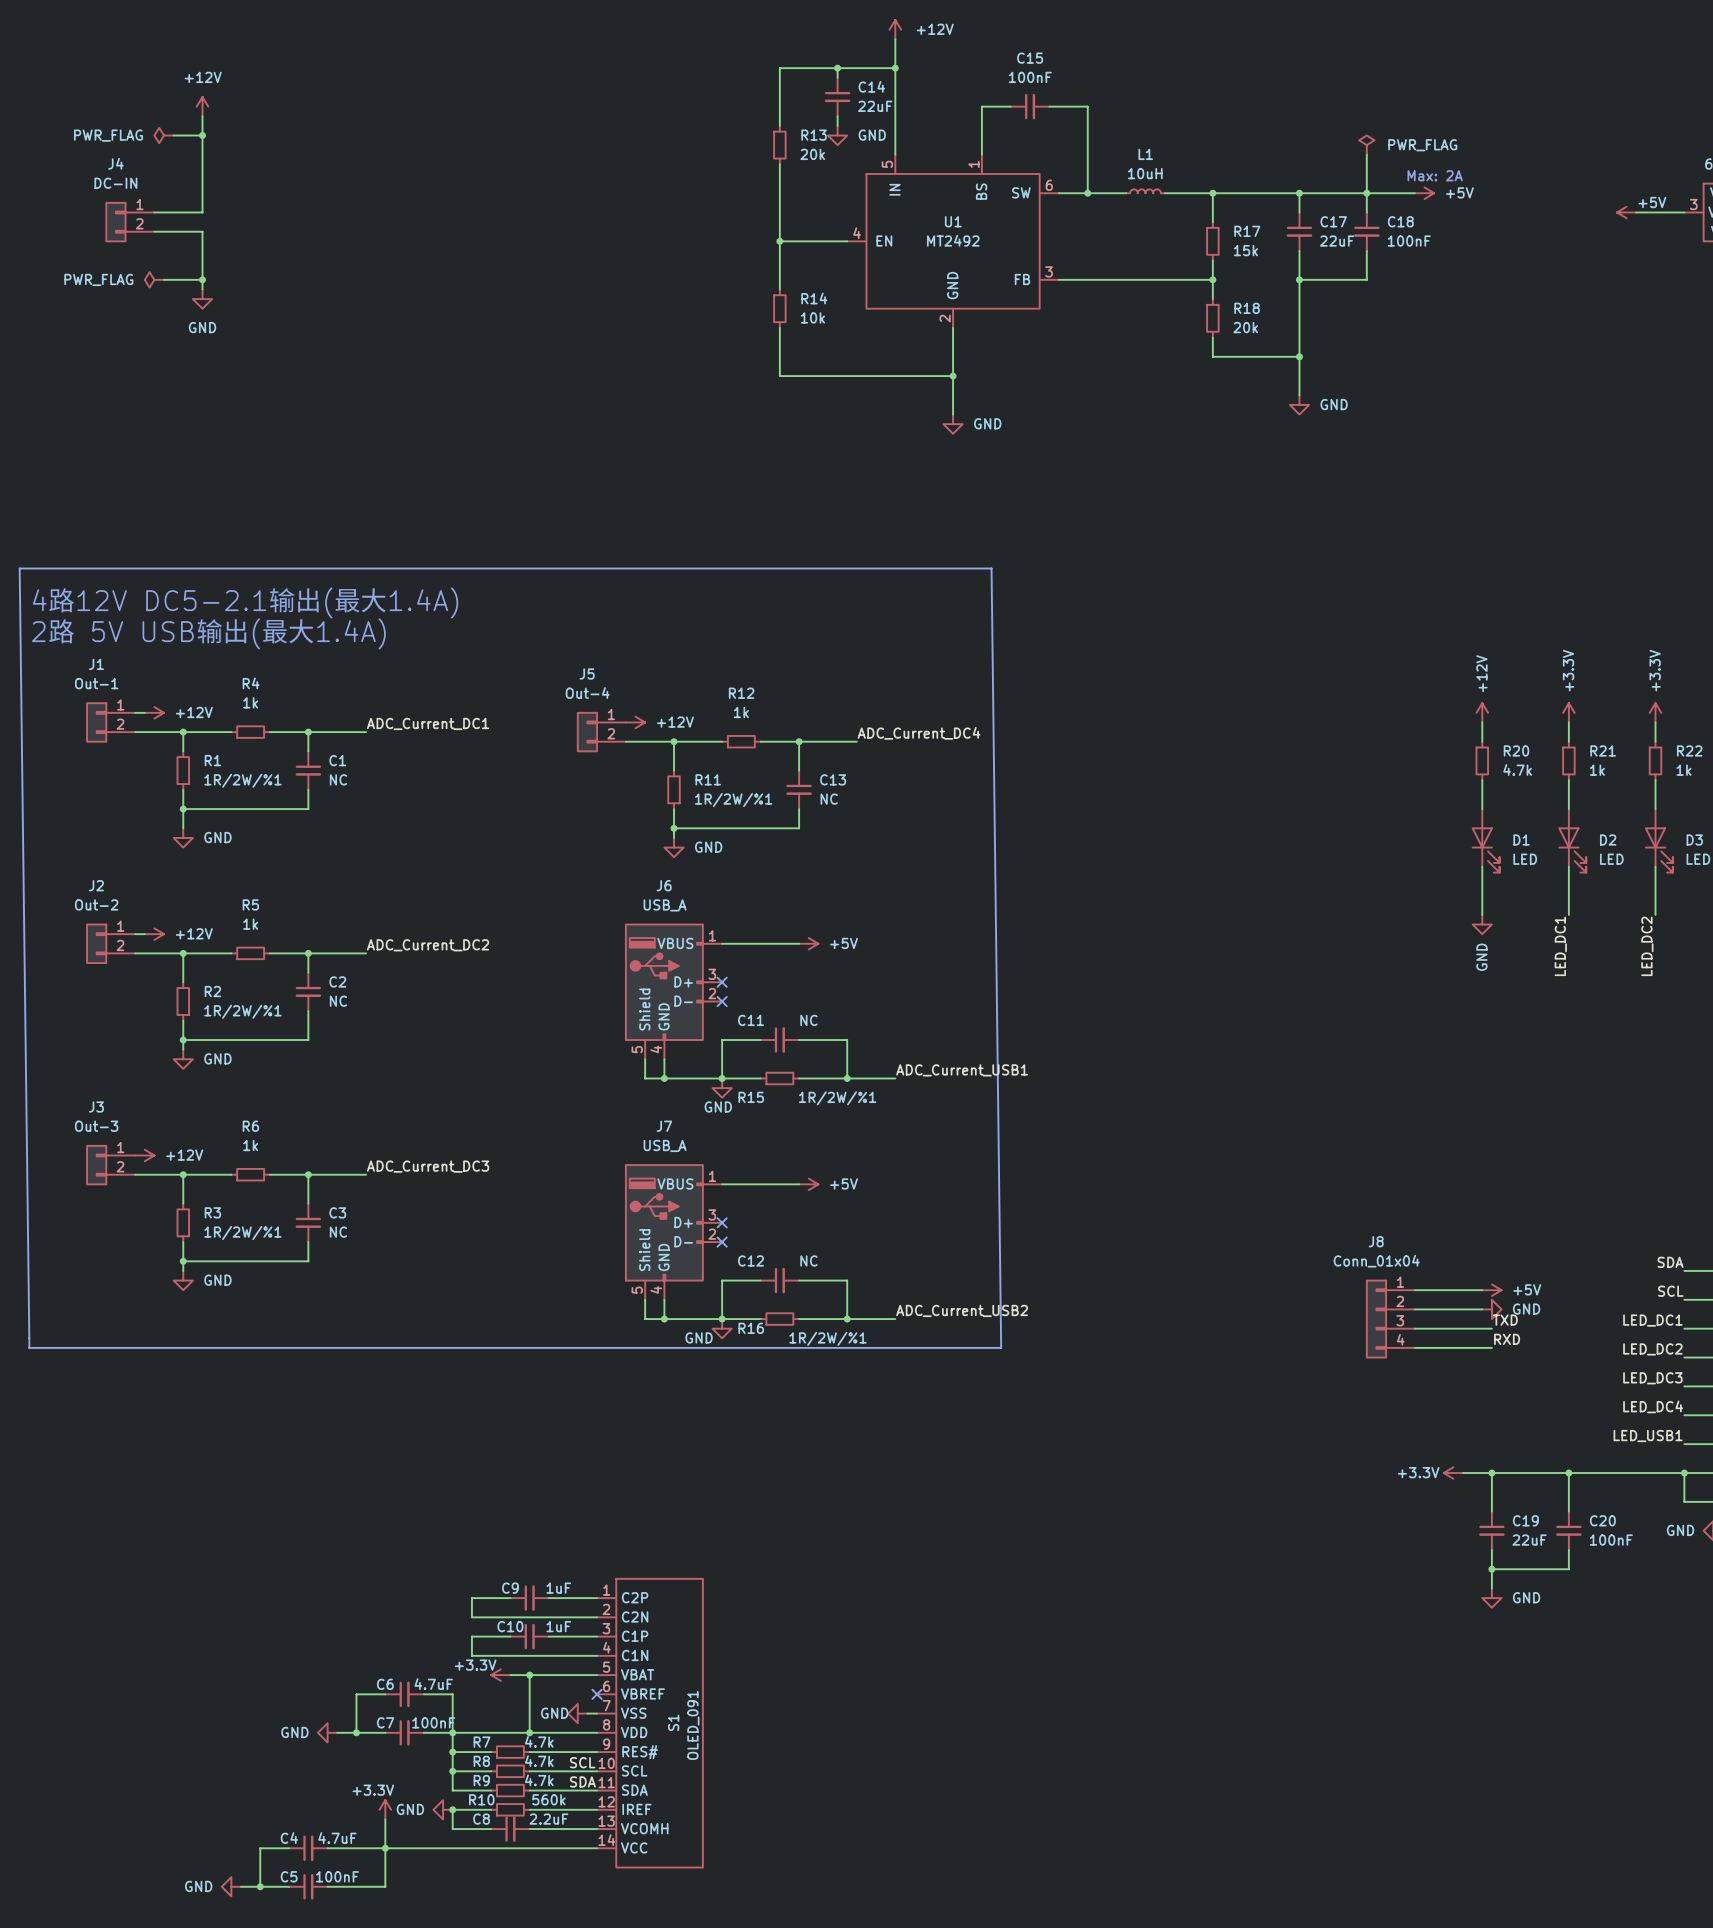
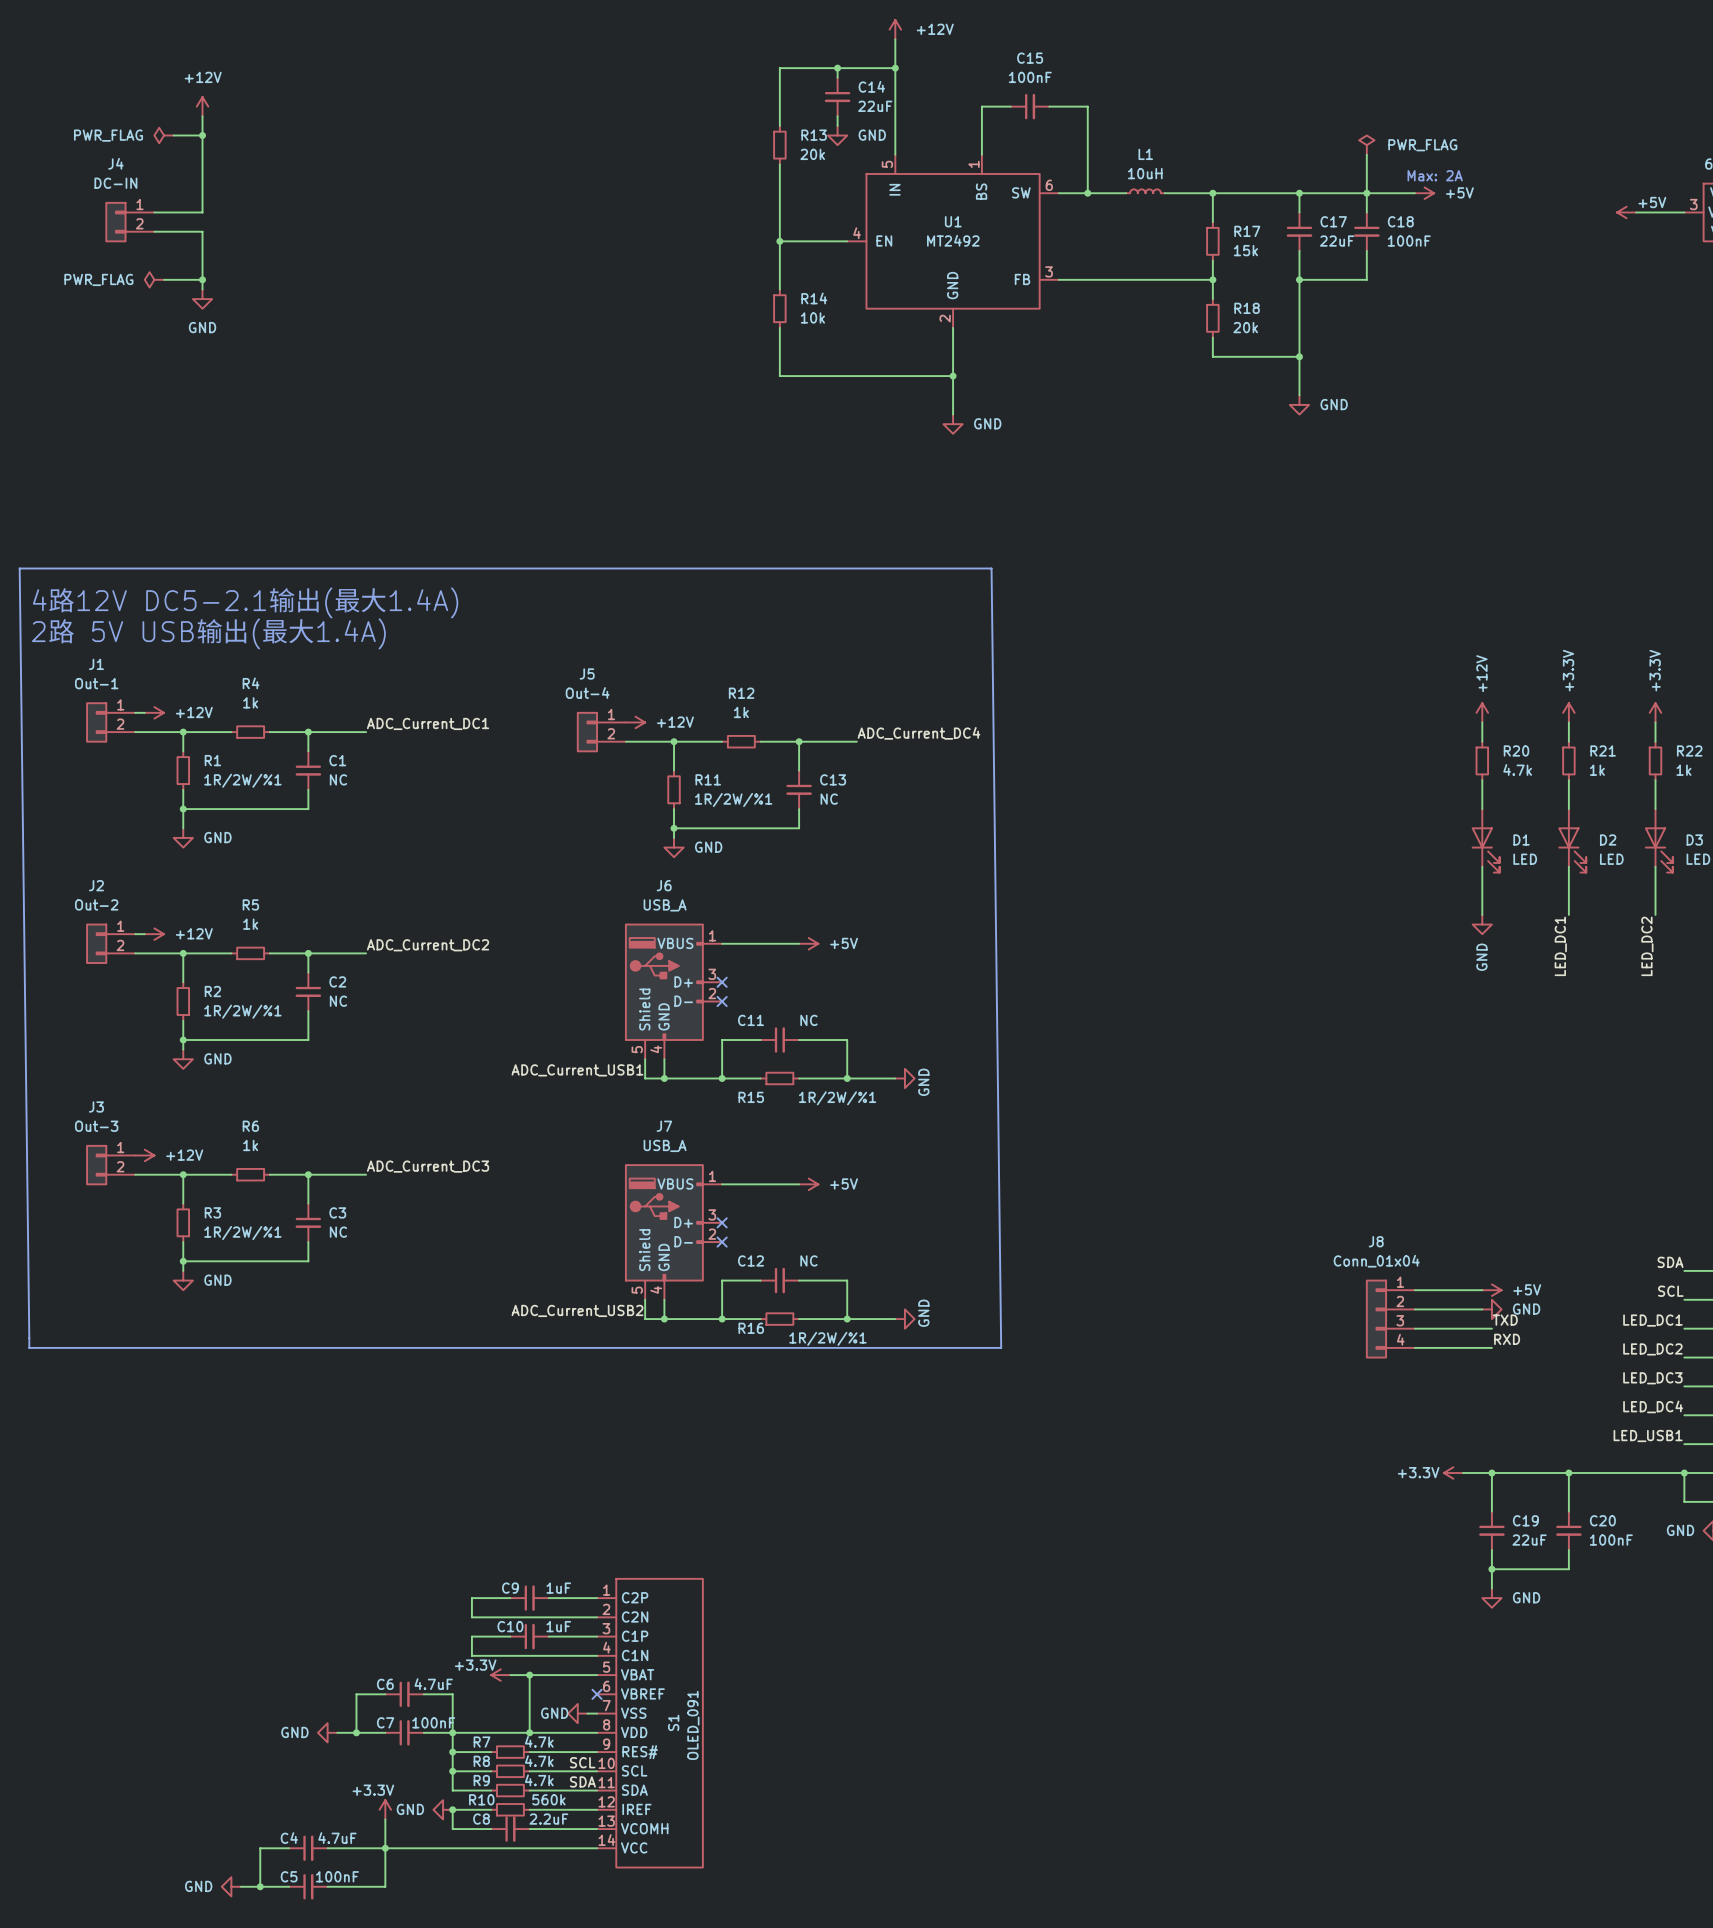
label: none -> ADC_Current_USB1 (577, 1070)
label: ADC_Current_USB1 (962, 1070) -> none
power symbol: none -> GND (904, 1078)
power symbol: GND (722, 1088) -> none
label: none -> ADC_Current_USB2 (577, 1310)
label: ADC_Current_USB2 (962, 1310) -> none
power symbol: none -> GND (904, 1319)
power symbol: GND (722, 1328) -> none

